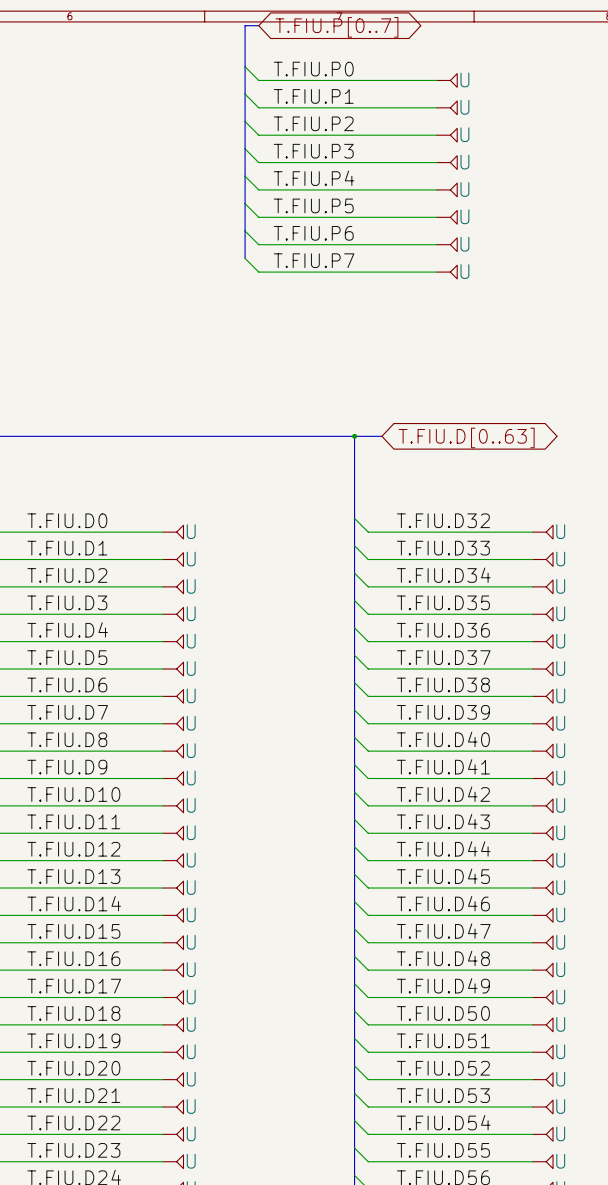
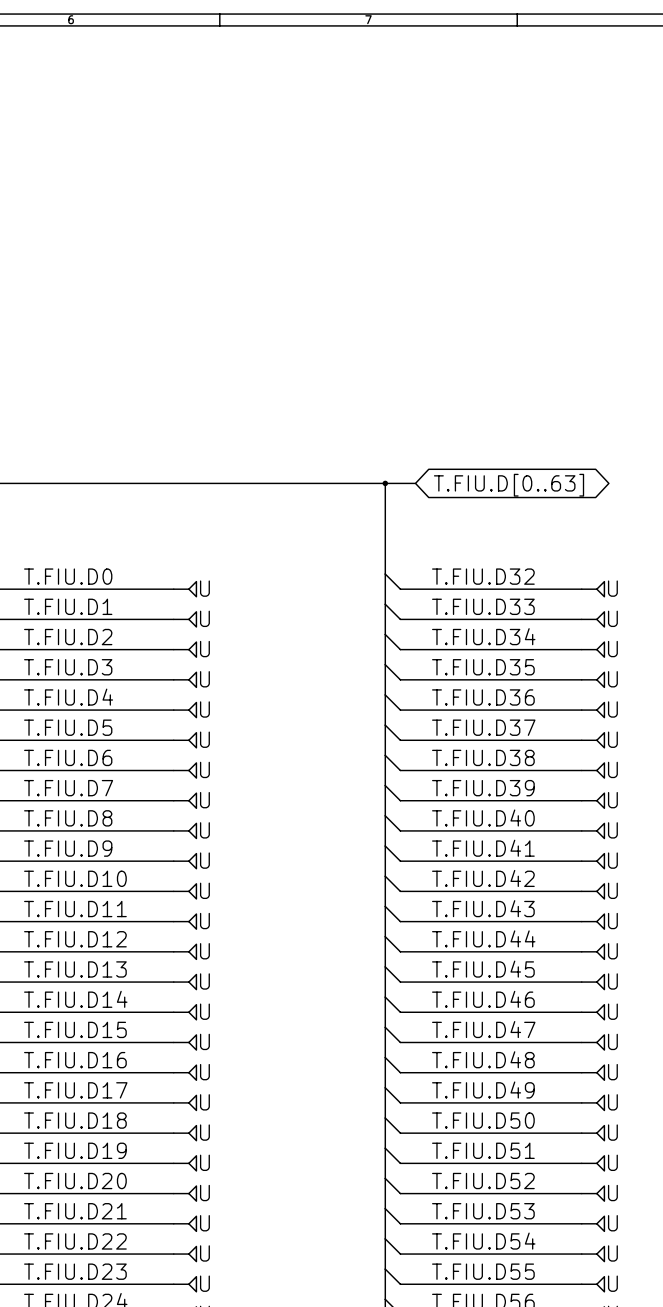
bus: (258, 25) (245, 25) (245, 258) -> none
global label: T.FIU.P[0..7] (336, 27) -> none
wire: (245, 66) (258, 80) (436, 80) -> none
label: T.FIU.P0 (313, 69) -> none
U: (447, 80) -> none
wire: (245, 94) (258, 107) (436, 107) -> none
label: T.FIU.P1 (313, 96) -> none
U: (447, 107) -> none
wire: (245, 121) (258, 135) (436, 135) -> none
label: T.FIU.P2 (313, 123) -> none
U: (447, 135) -> none
wire: (245, 148) (258, 162) (436, 162) -> none
label: T.FIU.P3 (313, 151) -> none
U: (447, 162) -> none
wire: (245, 176) (258, 189) (436, 189) -> none
label: T.FIU.P4 (314, 178) -> none
U: (447, 189) -> none
wire: (245, 203) (258, 217) (436, 217) -> none
label: T.FIU.P5 (313, 205) -> none
U: (447, 217) -> none
wire: (245, 231) (258, 244) (436, 244) -> none
label: T.FIU.P6 (313, 233) -> none
U: (447, 244) -> none
wire: (245, 258) (258, 272) (436, 272) -> none
label: T.FIU.P7 (314, 260) -> none
U: (447, 272) -> none

